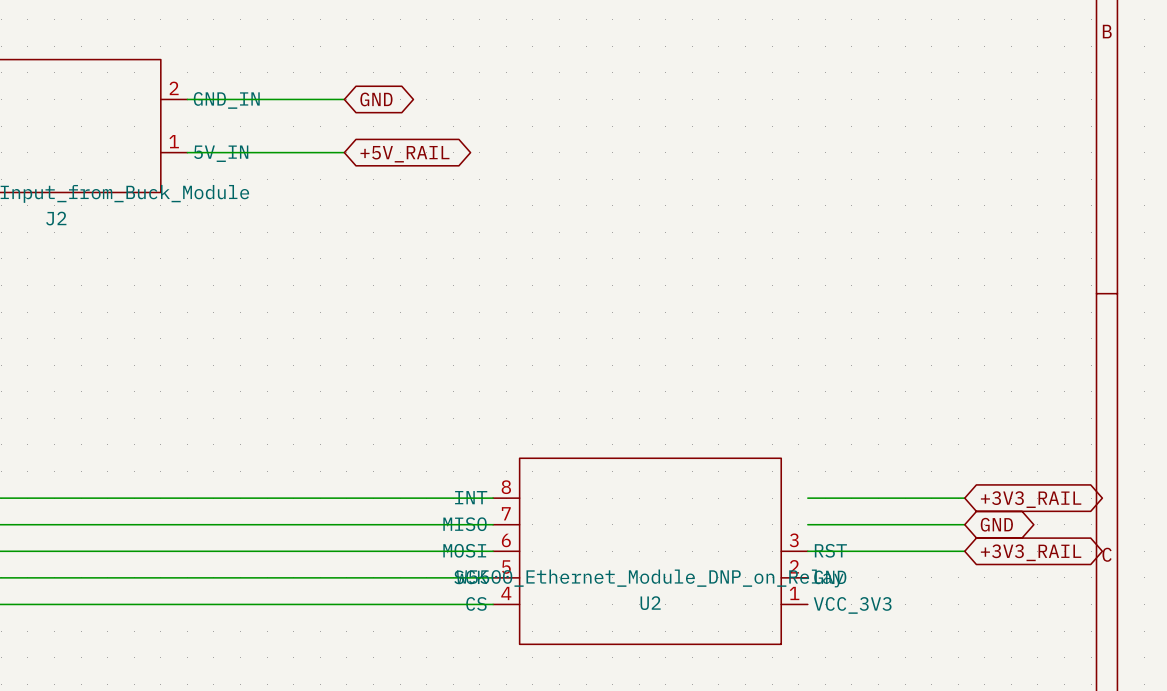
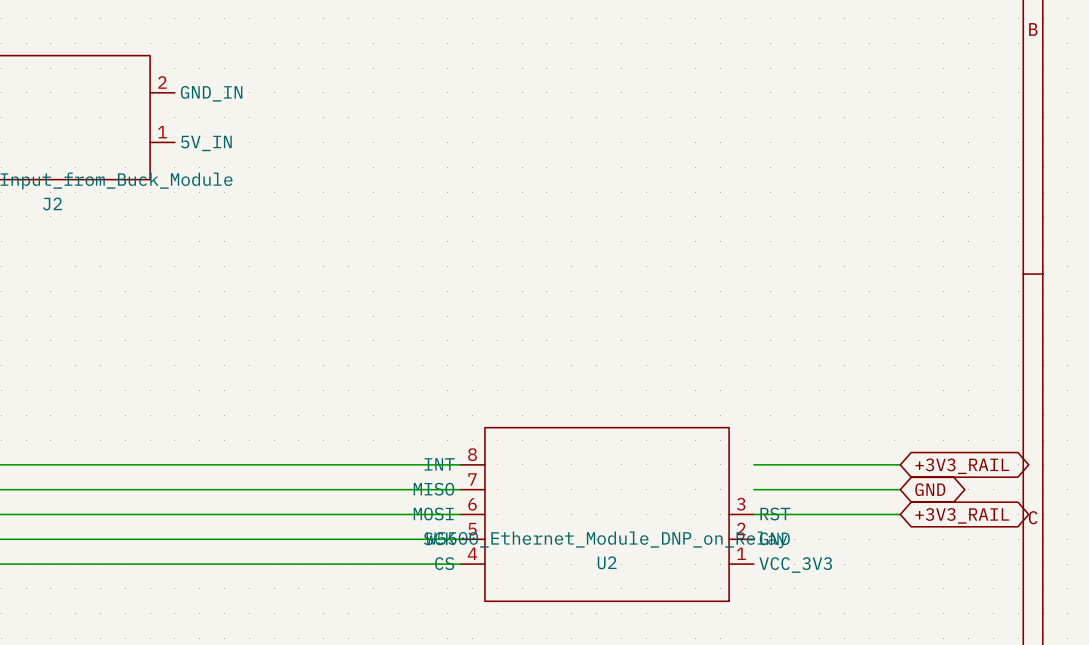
wire: (187, 99) (344, 99) -> none
global label: GND (376, 99) -> none
wire: (187, 152) (344, 152) -> none
global label: +5V_RAIL (404, 154) -> none

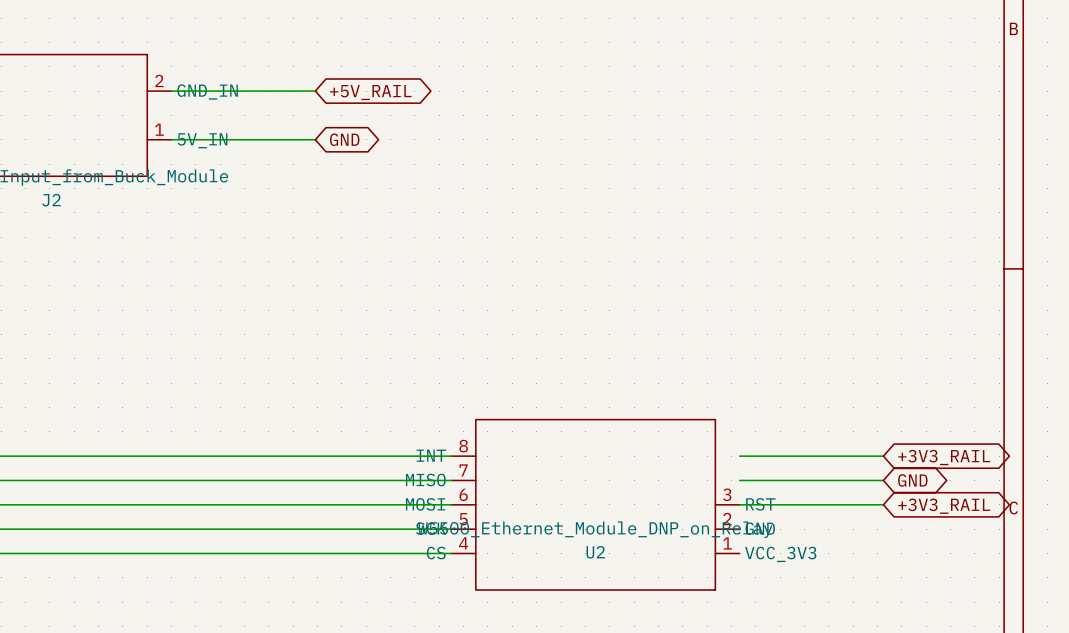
wire: none -> (171, 91) (315, 91)
global label: none -> +5V_RAIL (370, 92)
wire: none -> (171, 139) (315, 139)
global label: none -> GND (344, 139)

